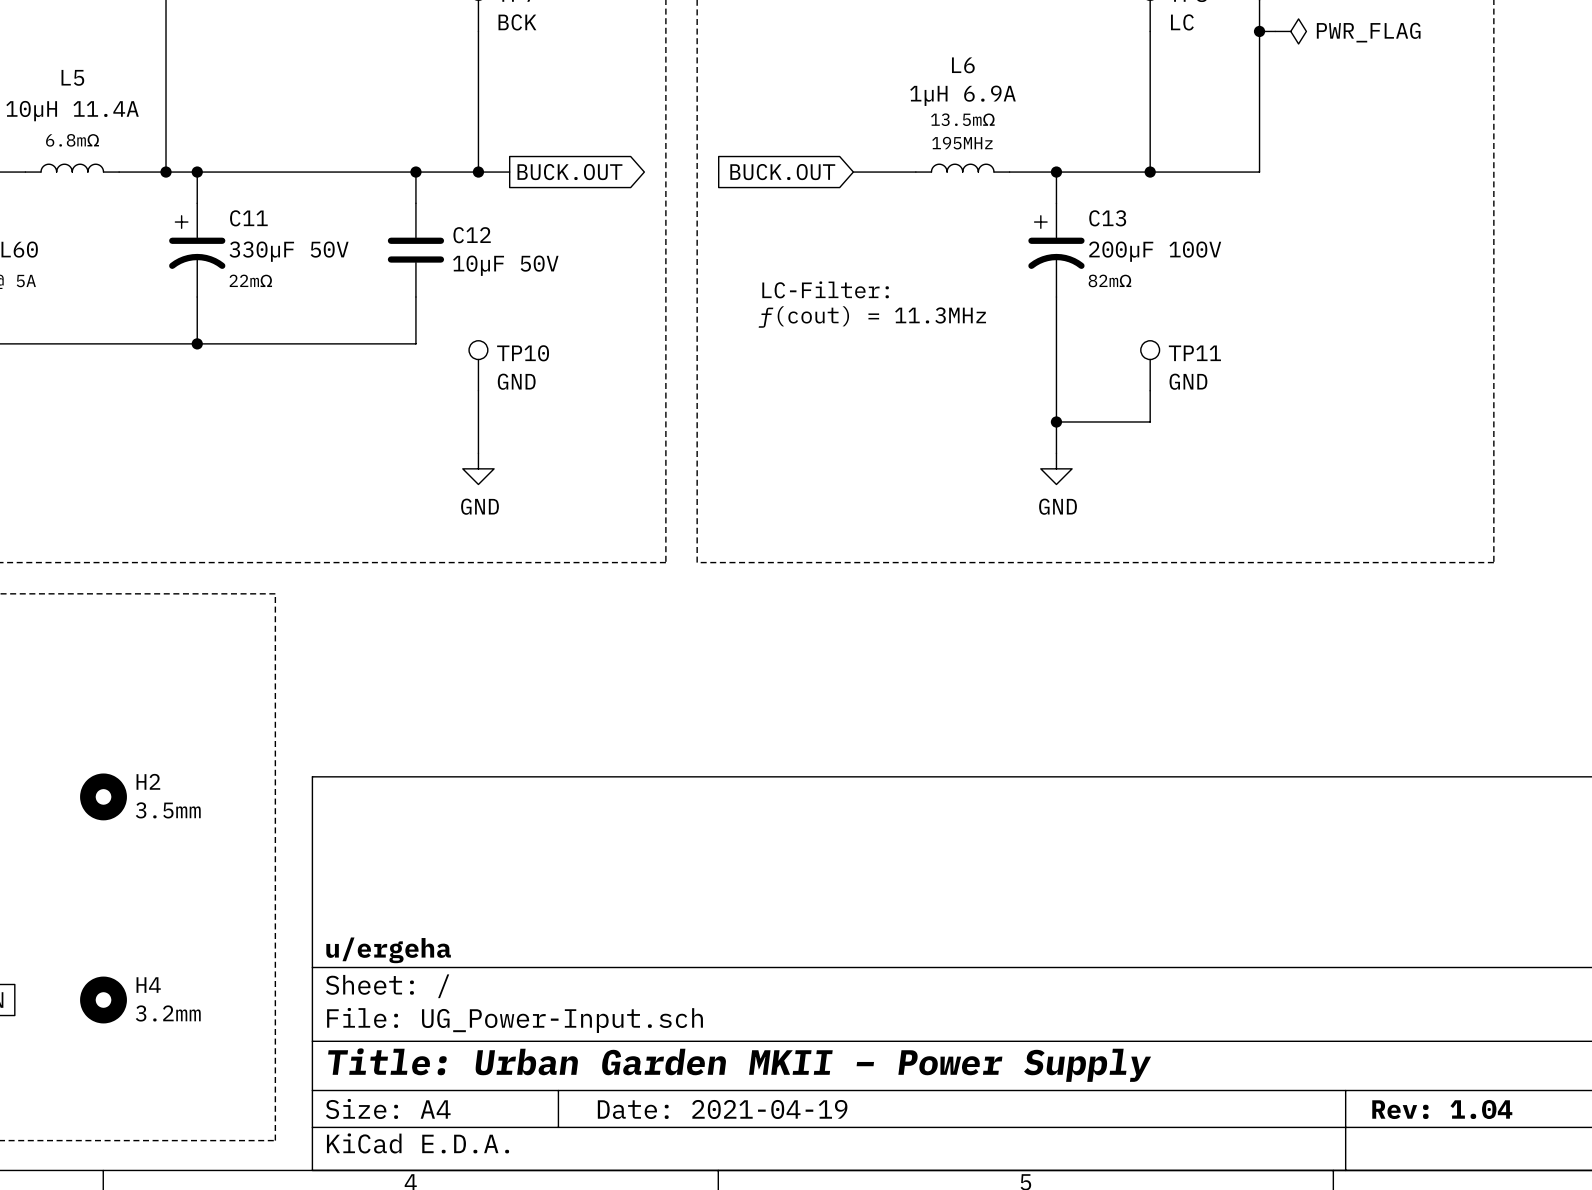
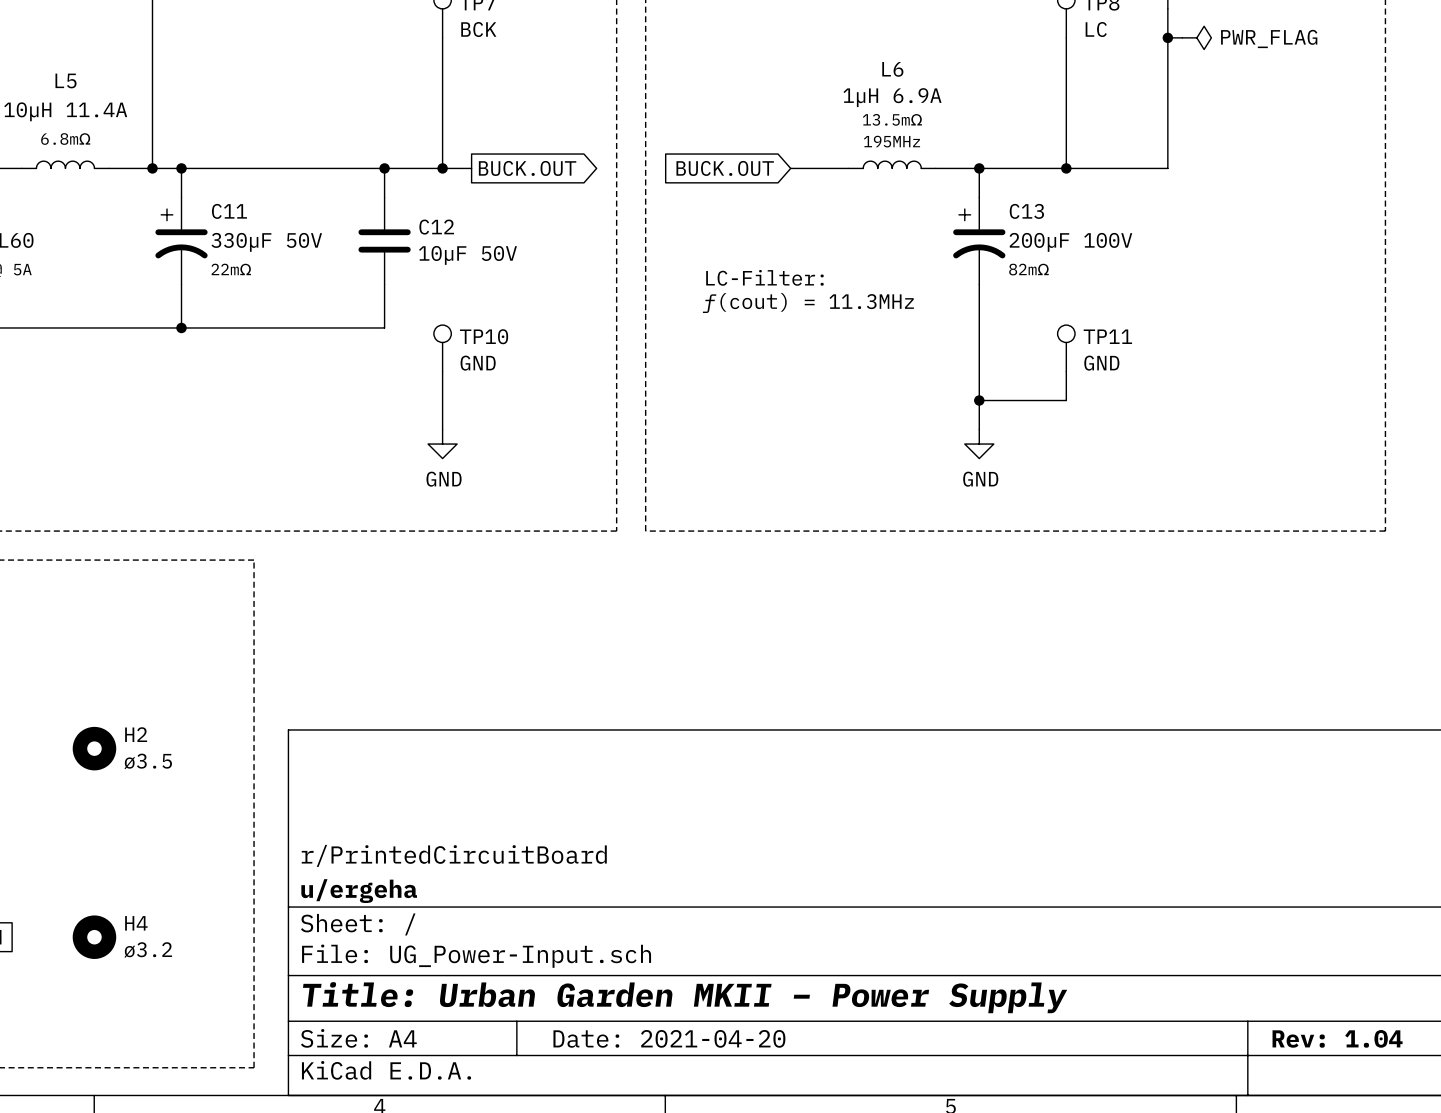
H2 value: 3.5mm (168, 810) -> ø3.5 (148, 761)
title block: none -> r/PrintedCircuitBoard (454, 855)
H4 value: 3.2mm (168, 1013) -> ø3.2 (148, 950)
title block: Date: 2021-04-19 (722, 1109) -> Date: 2021-04-20 (669, 1038)

